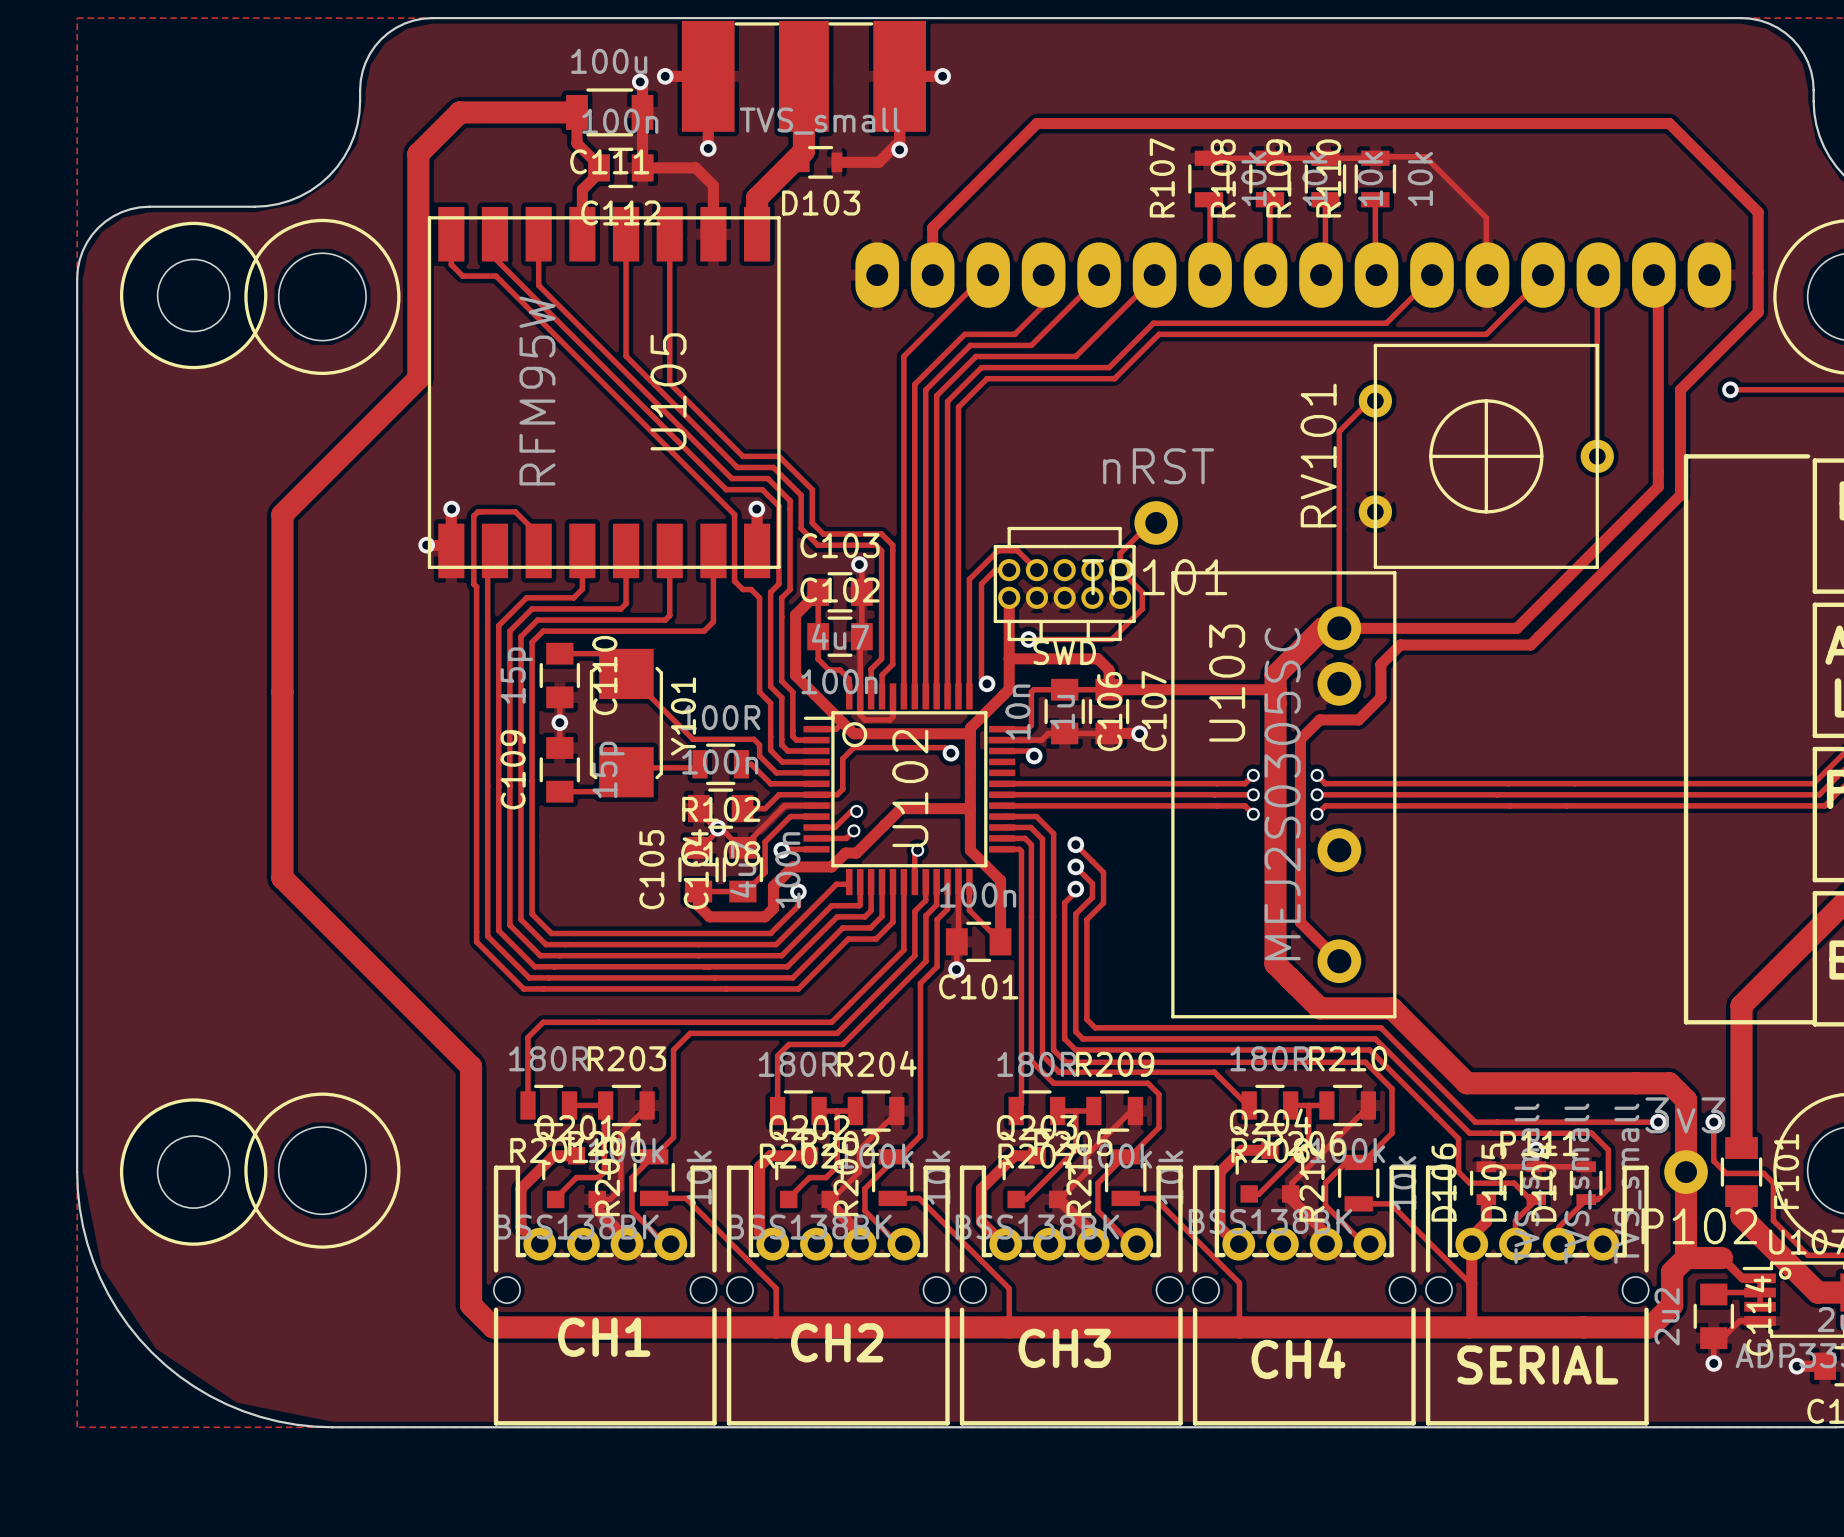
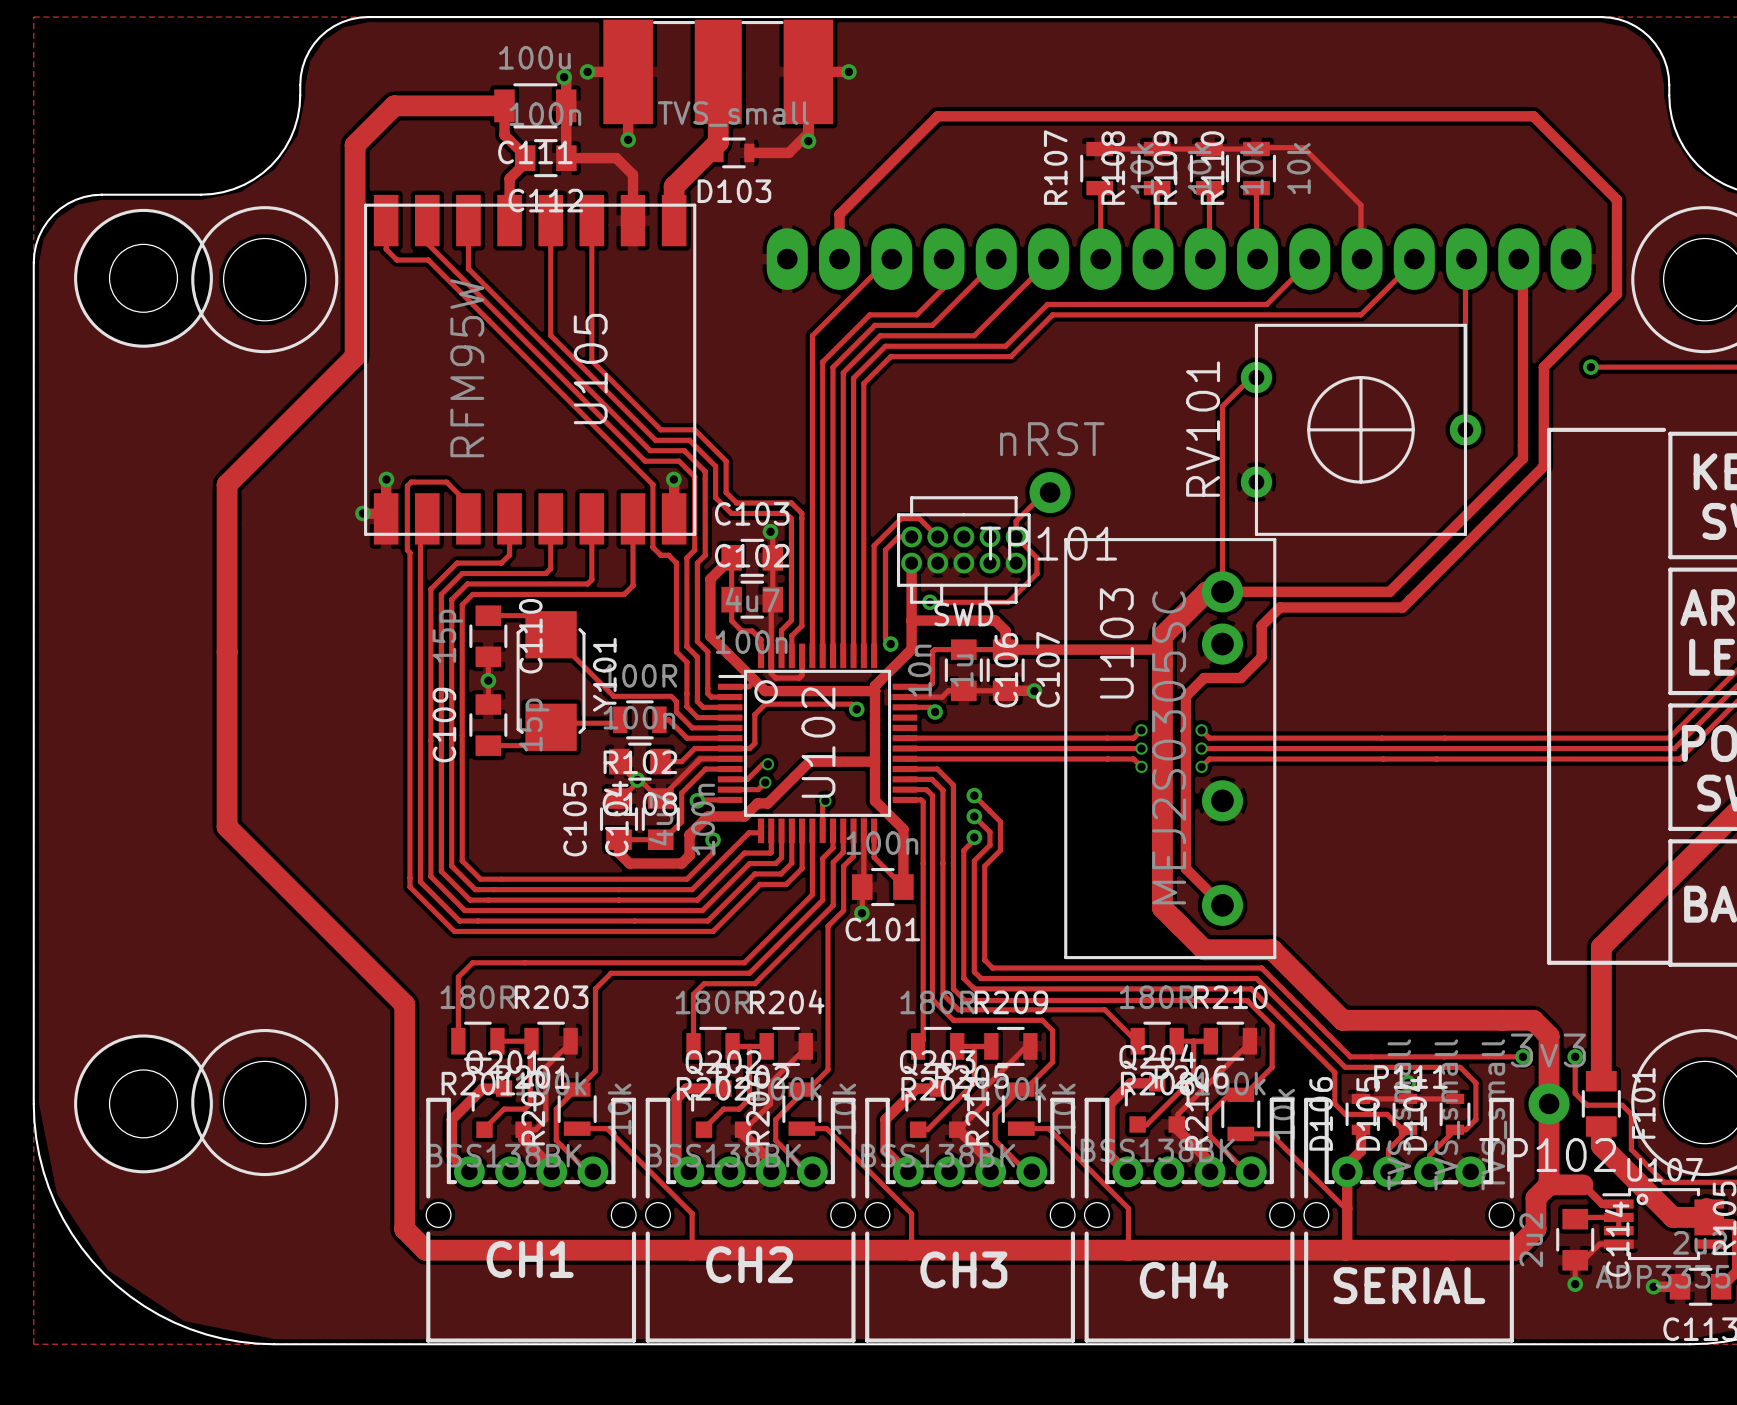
part footprint: [993, 526, 1136, 642] -> [897, 496, 1031, 604]

